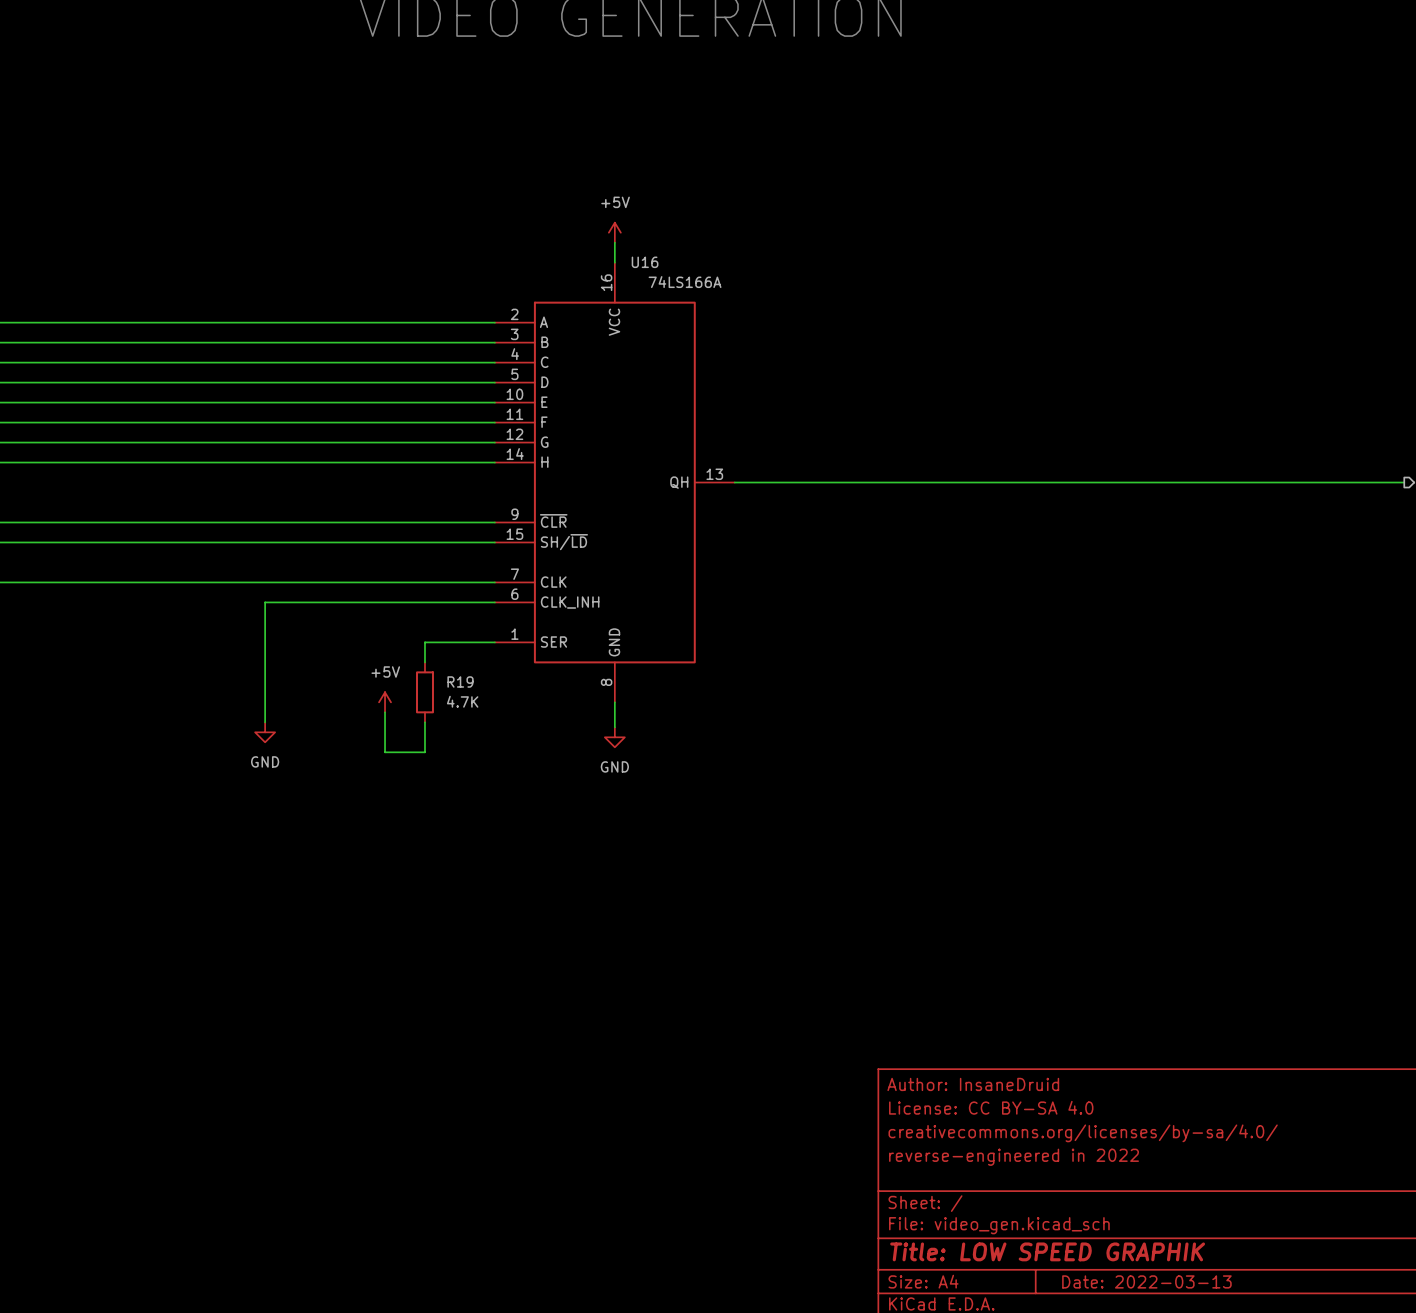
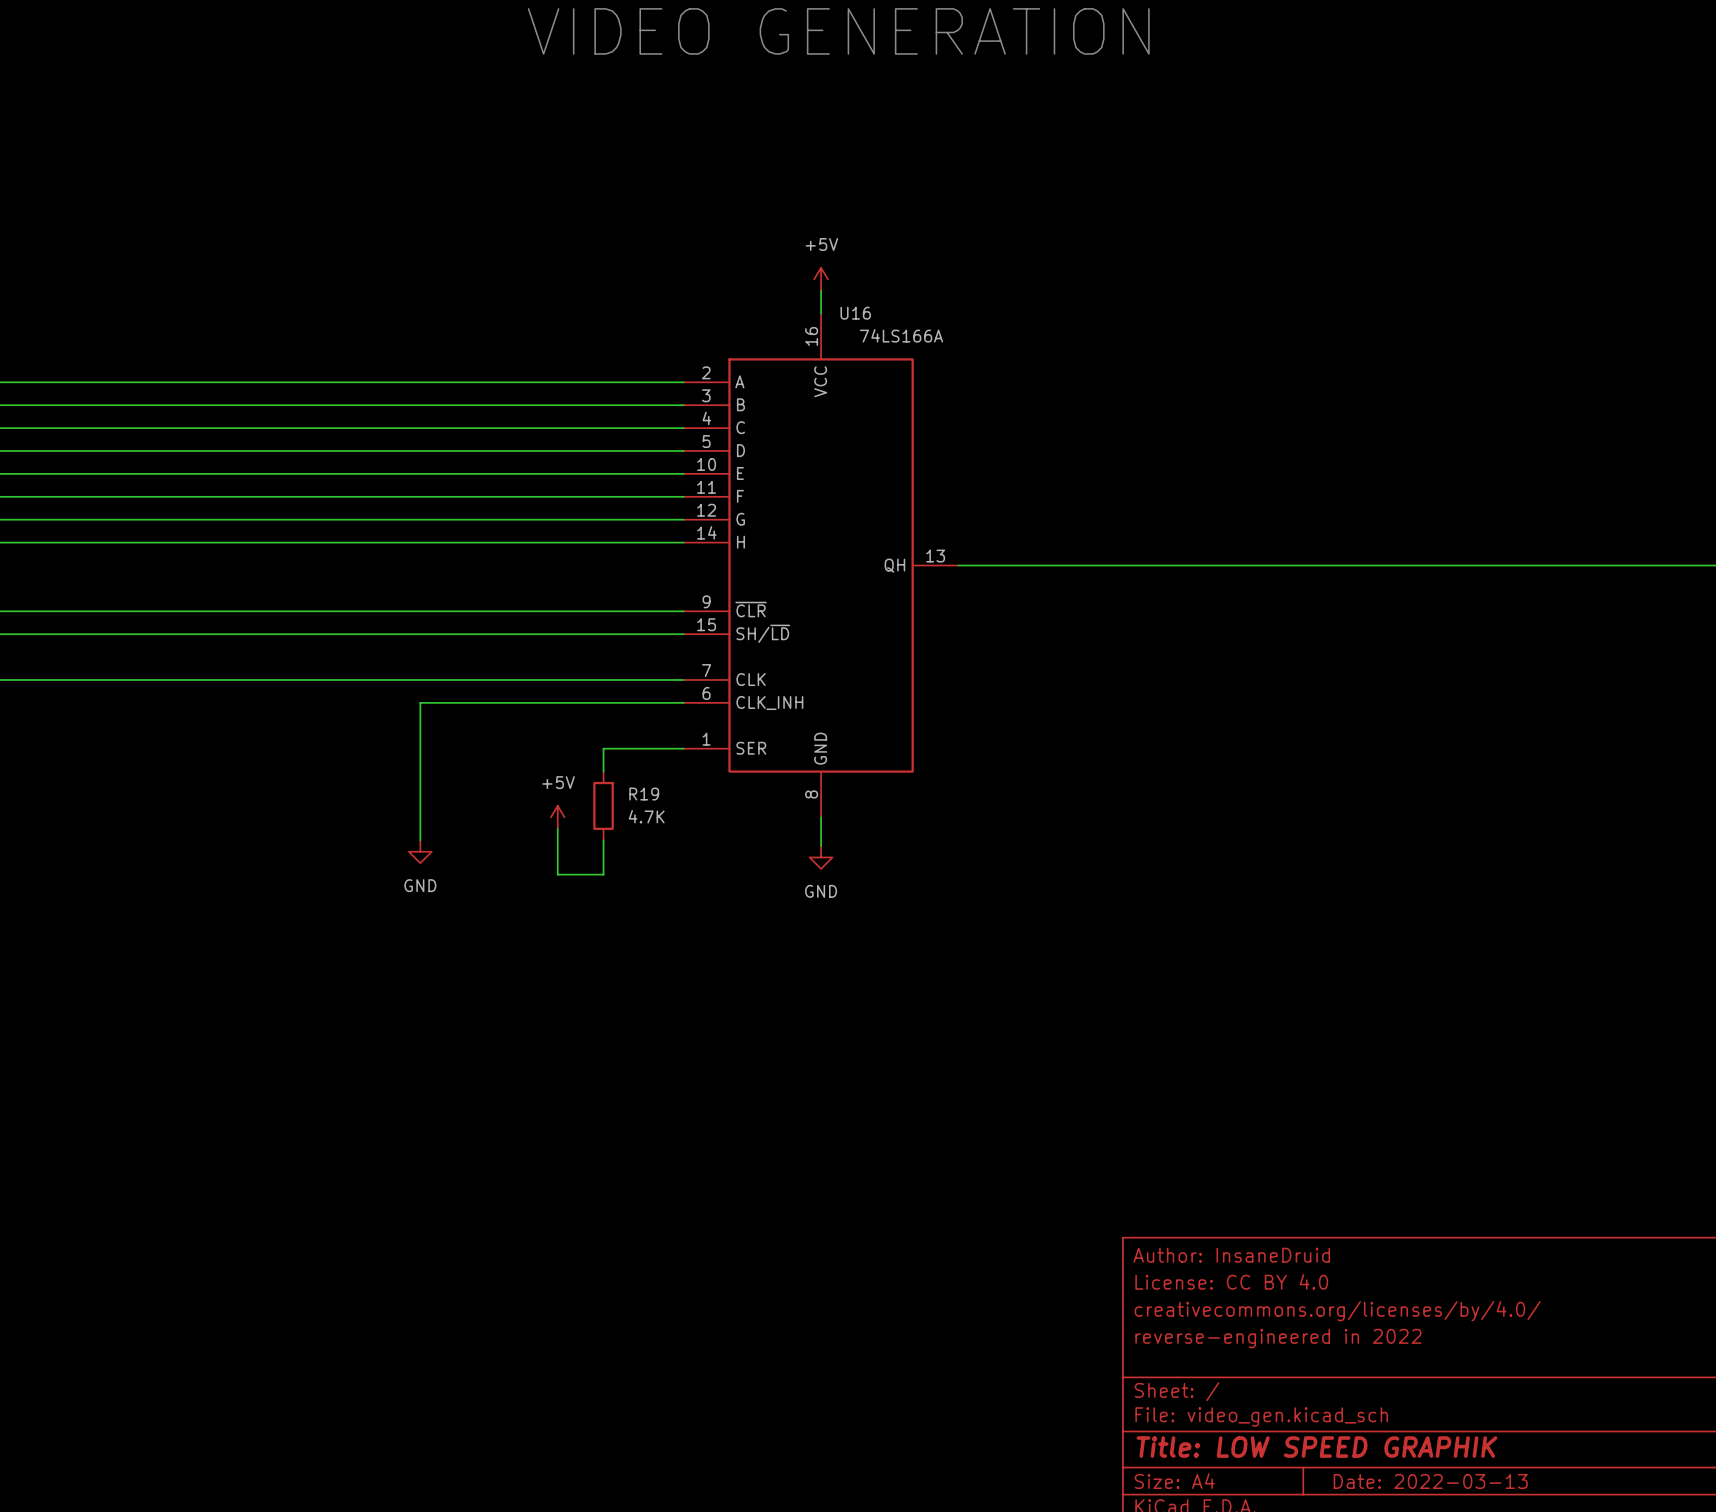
title block: License: CC BY-SA 4.0 (991, 1107) -> License: CC BY 4.0 (1231, 1281)
title block: creativecommons.org/licenses/by-sa/4.0/ (1083, 1133) -> creativecommons.org/licenses/by/4.0/ (1337, 1311)

